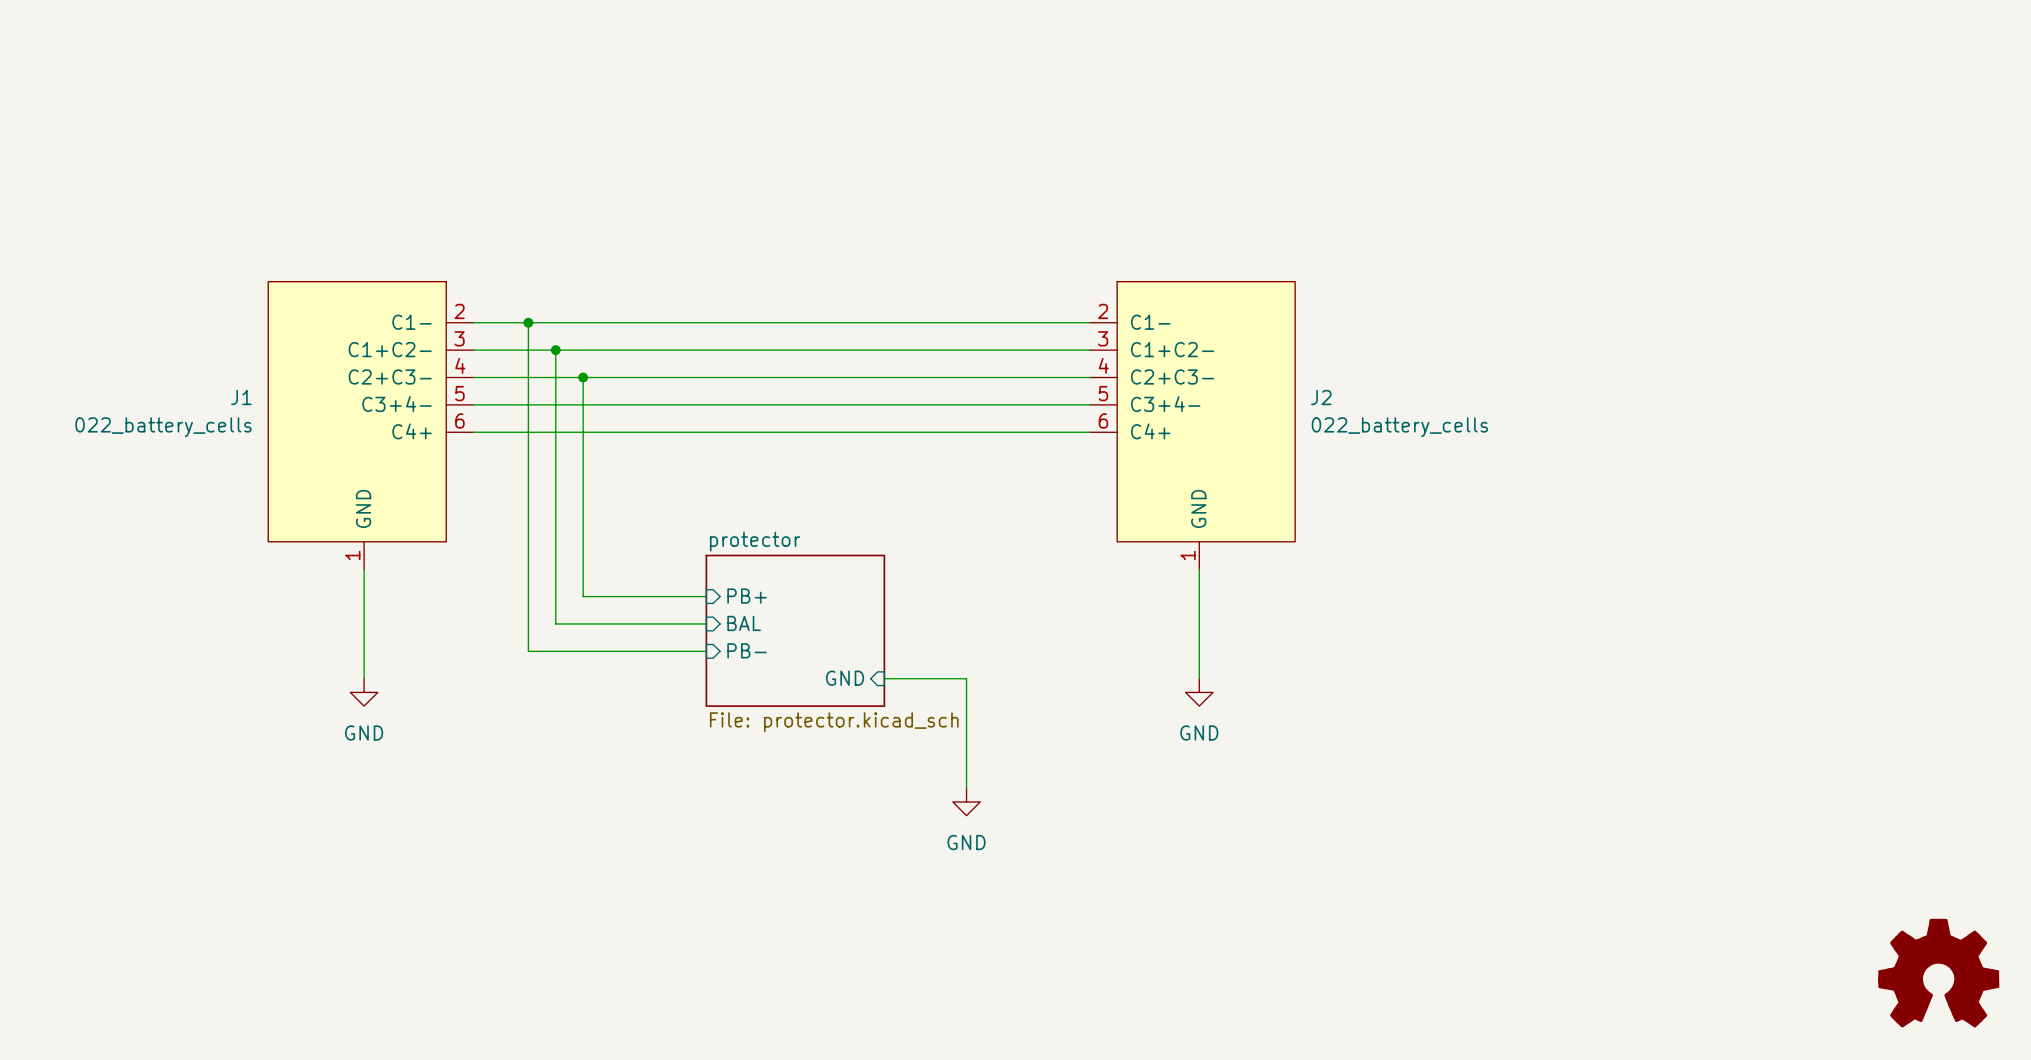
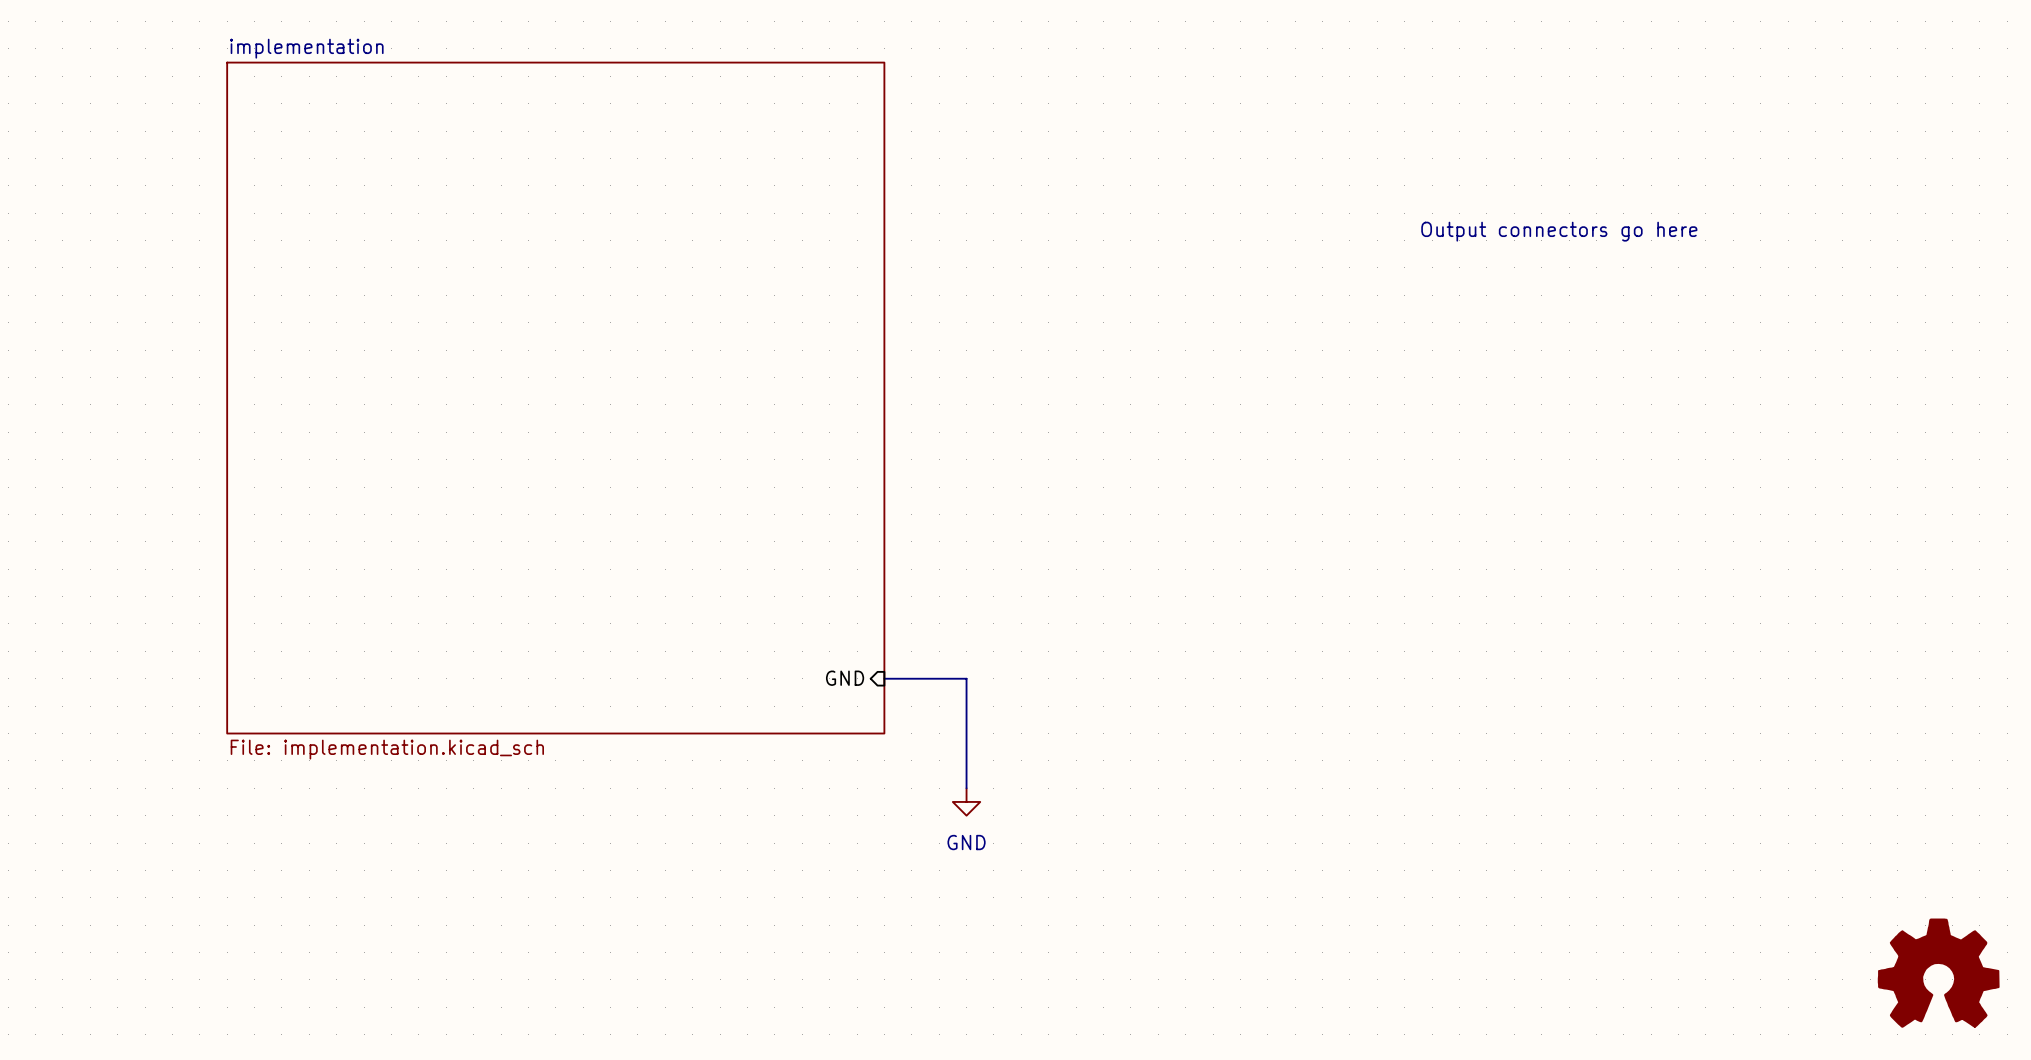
text: none -> Output connectors go here (1559, 231)
wire: (473, 322) (1089, 322) -> none
wire: (528, 322) (528, 651) (706, 651) -> none
junction: (528, 322) -> none
wire: (473, 350) (1089, 350) -> none
wire: (555, 350) (555, 623) (706, 623) -> none
junction: (555, 350) -> none
wire: (473, 377) (1089, 377) -> none
wire: (583, 377) (583, 596) (706, 596) -> none
junction: (583, 377) -> none
sheet implementation: none -> File: implementation.kicad_sch (555, 398)
wire: (473, 404) (1089, 404) -> none
J1: 022_battery_cells (370, 425) -> none
J2: 022_battery_cells (1192, 425) -> none
wire: (473, 432) (1089, 432) -> none
wire: (364, 569) (364, 678) -> none
wire: (1199, 569) (1199, 678) -> none
sheet pin: PB+ (747, 596) -> none
sheet pin: BAL (744, 623) -> none
sheet protector: File: protector.kicad_sch (795, 630) -> none
sheet pin: PB- (747, 650) -> none
power symbol: GND (364, 692) -> none
power symbol: GND (1199, 692) -> none

